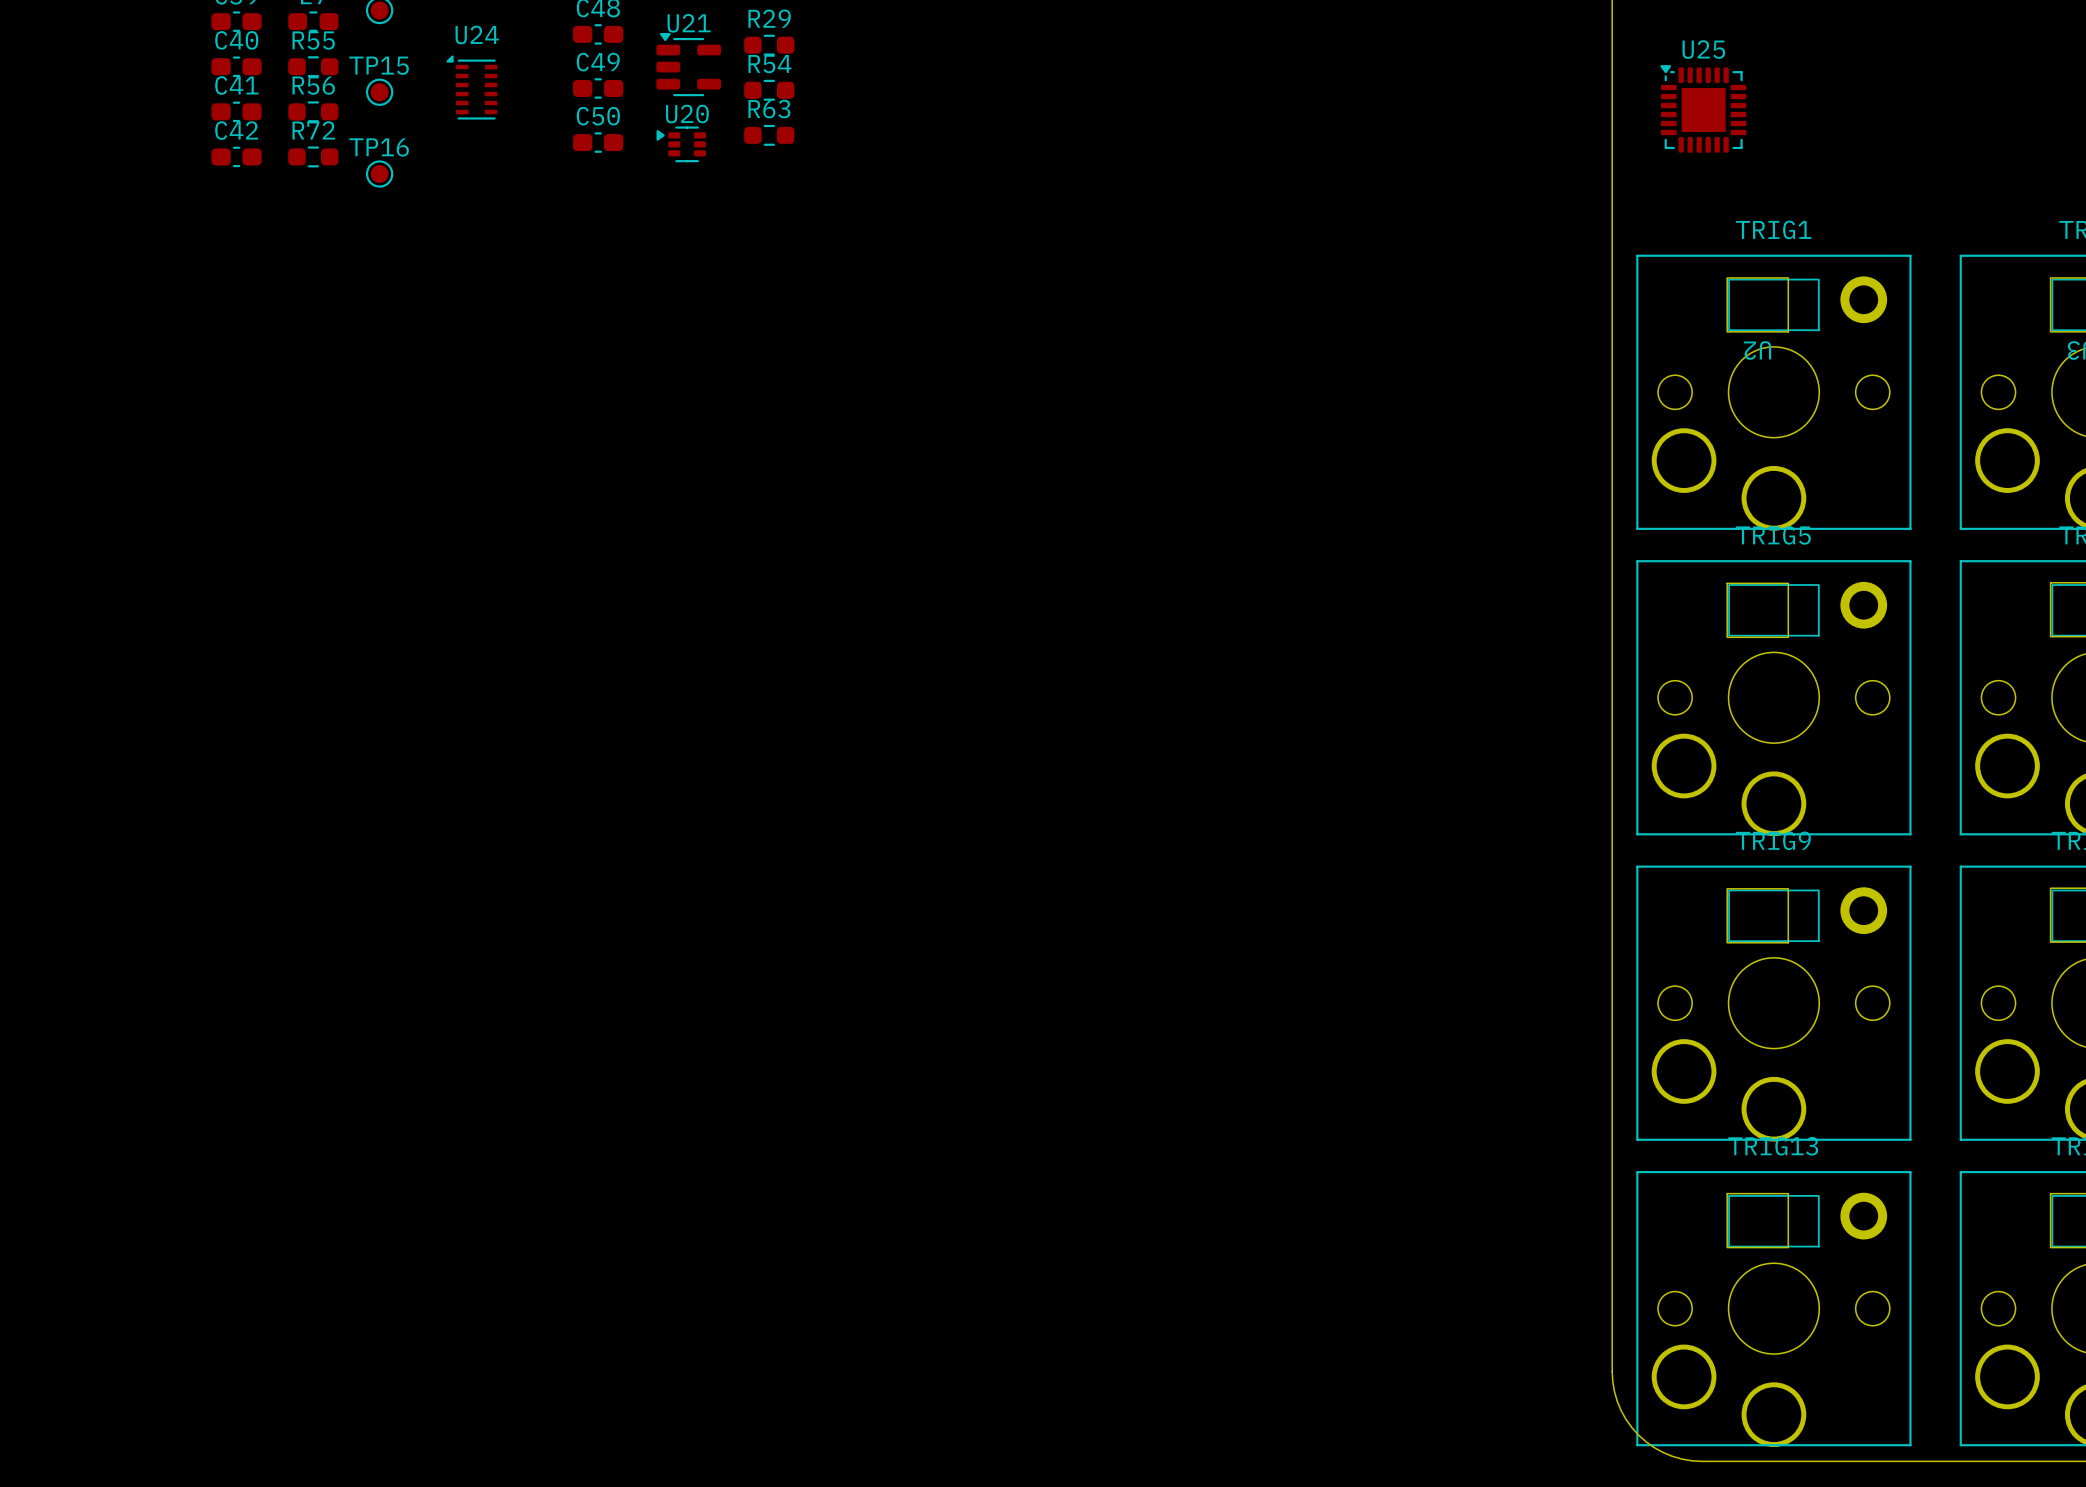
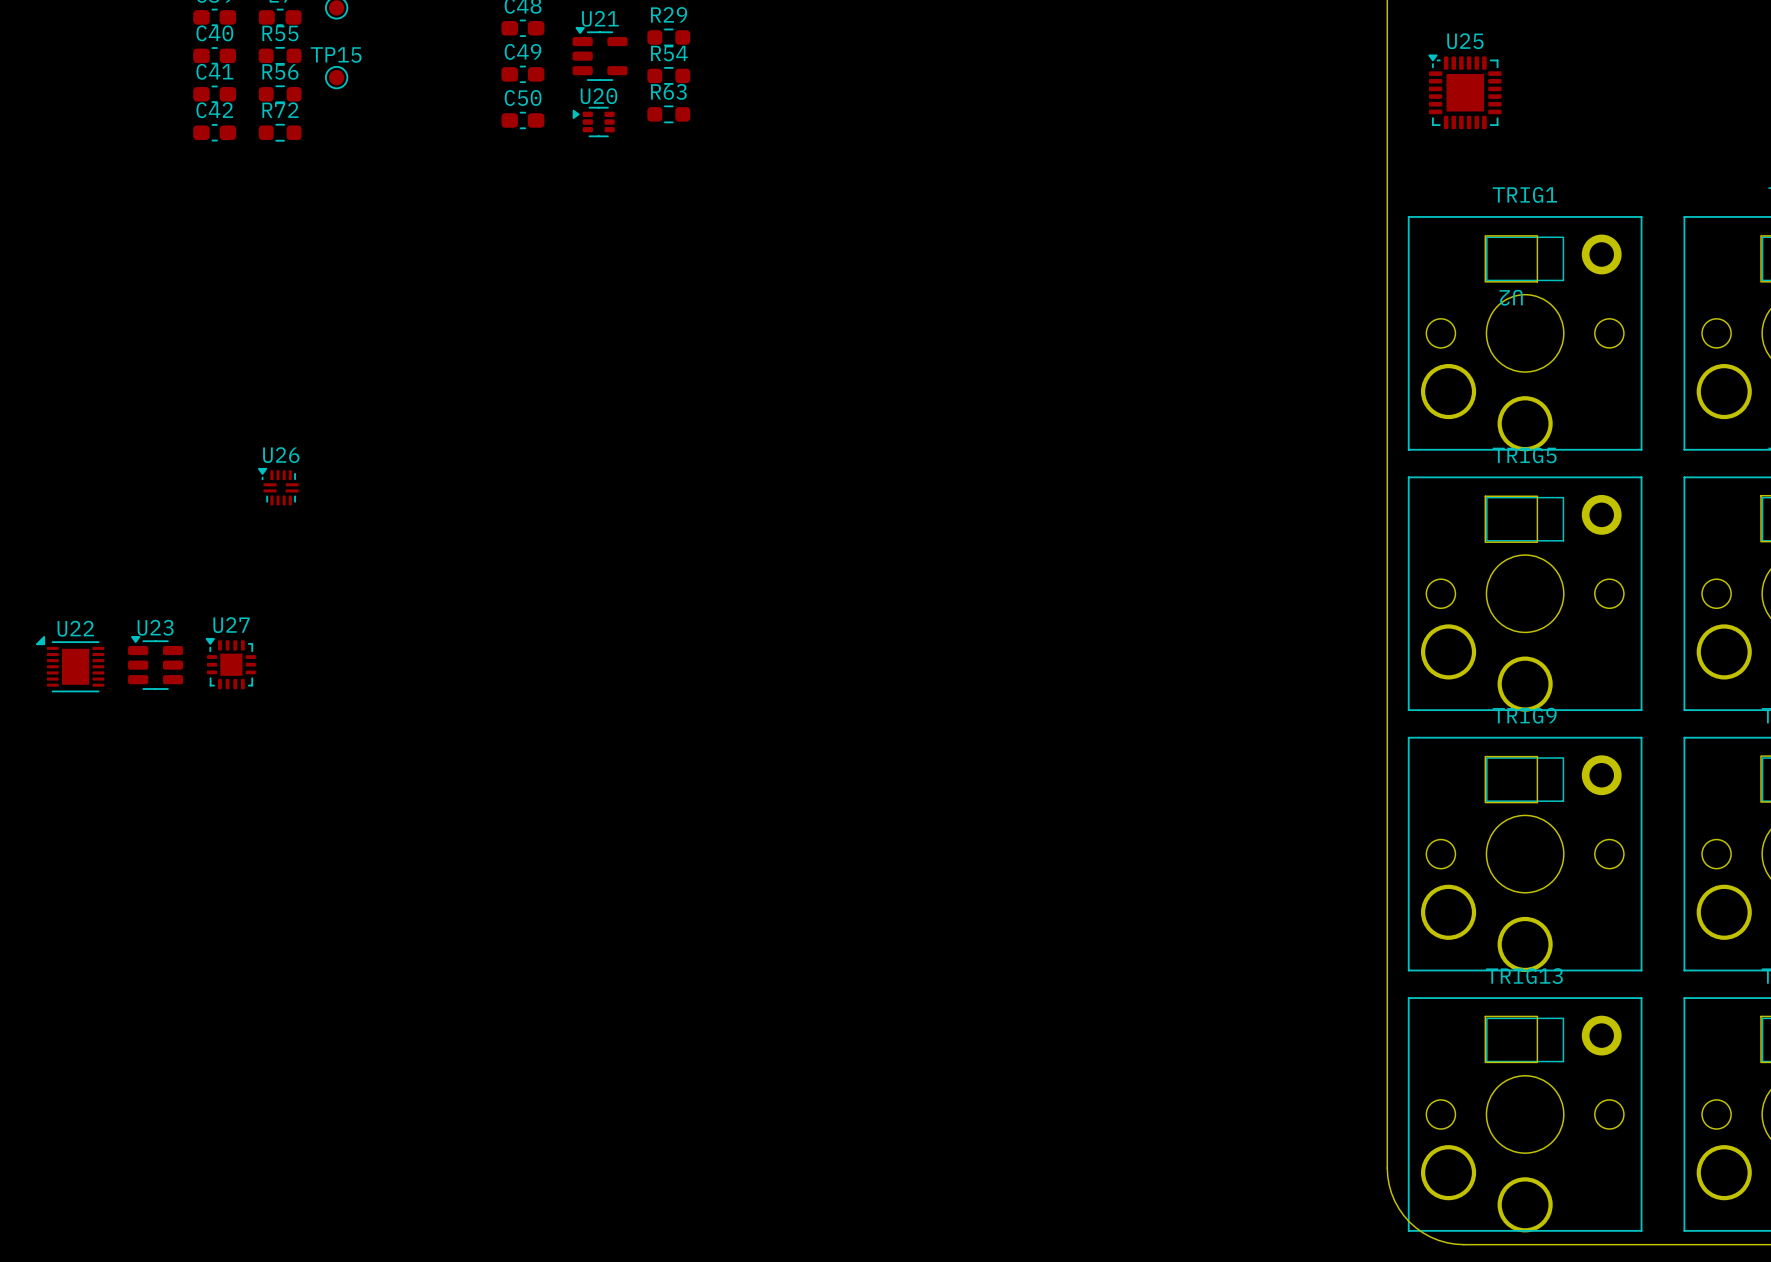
U24: (471, 87) -> none
TP16: (379, 174) -> none
U26: none -> (278, 486)
U23: none -> (155, 662)
U27: none -> (230, 663)
U22: none -> (70, 664)

